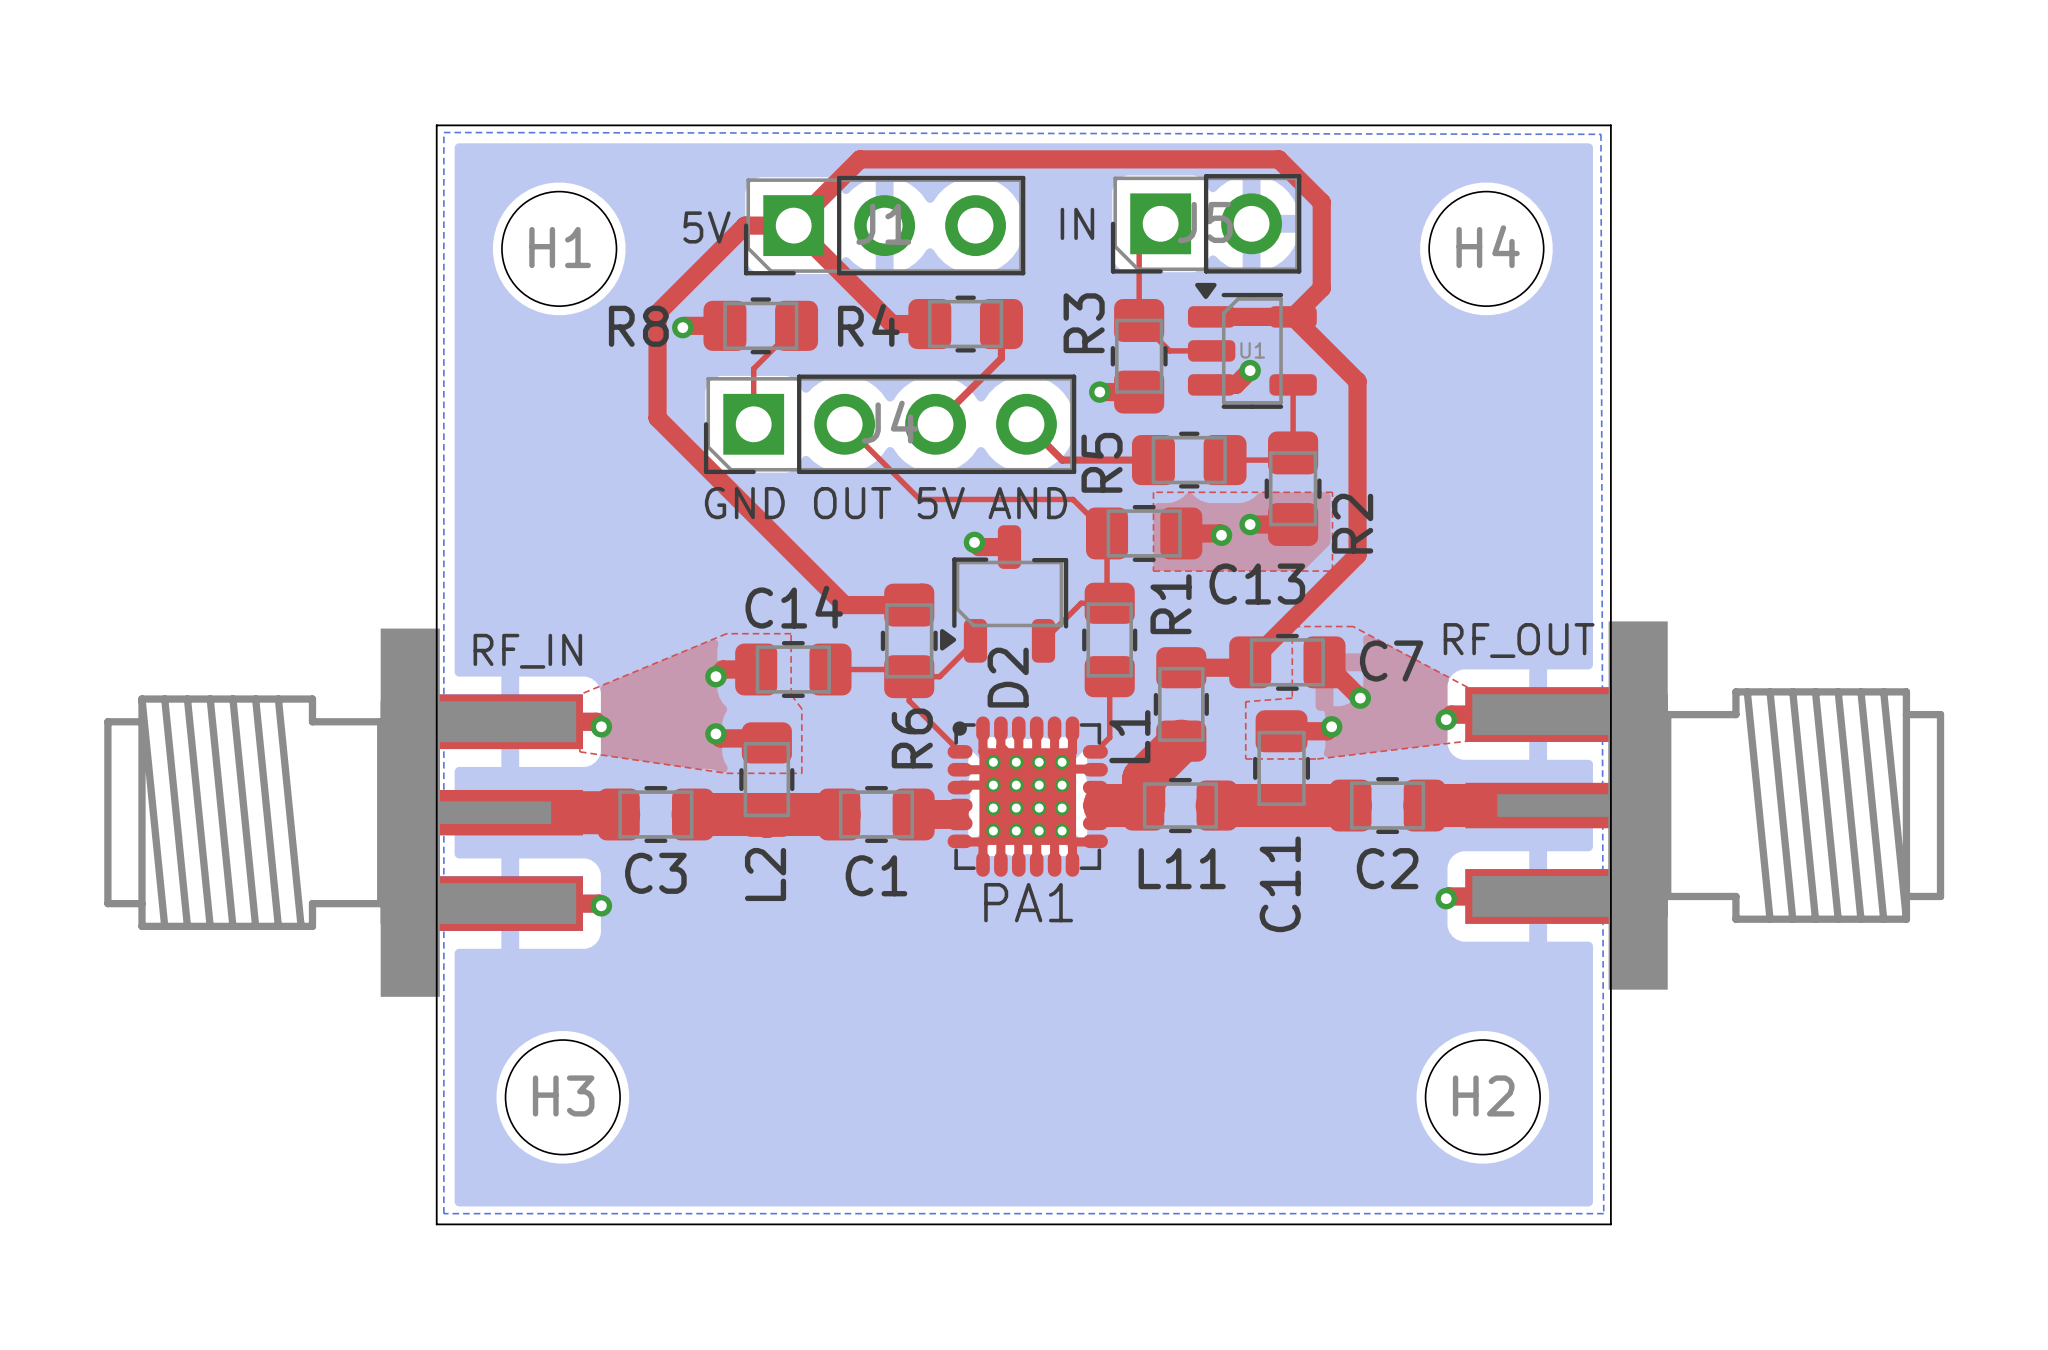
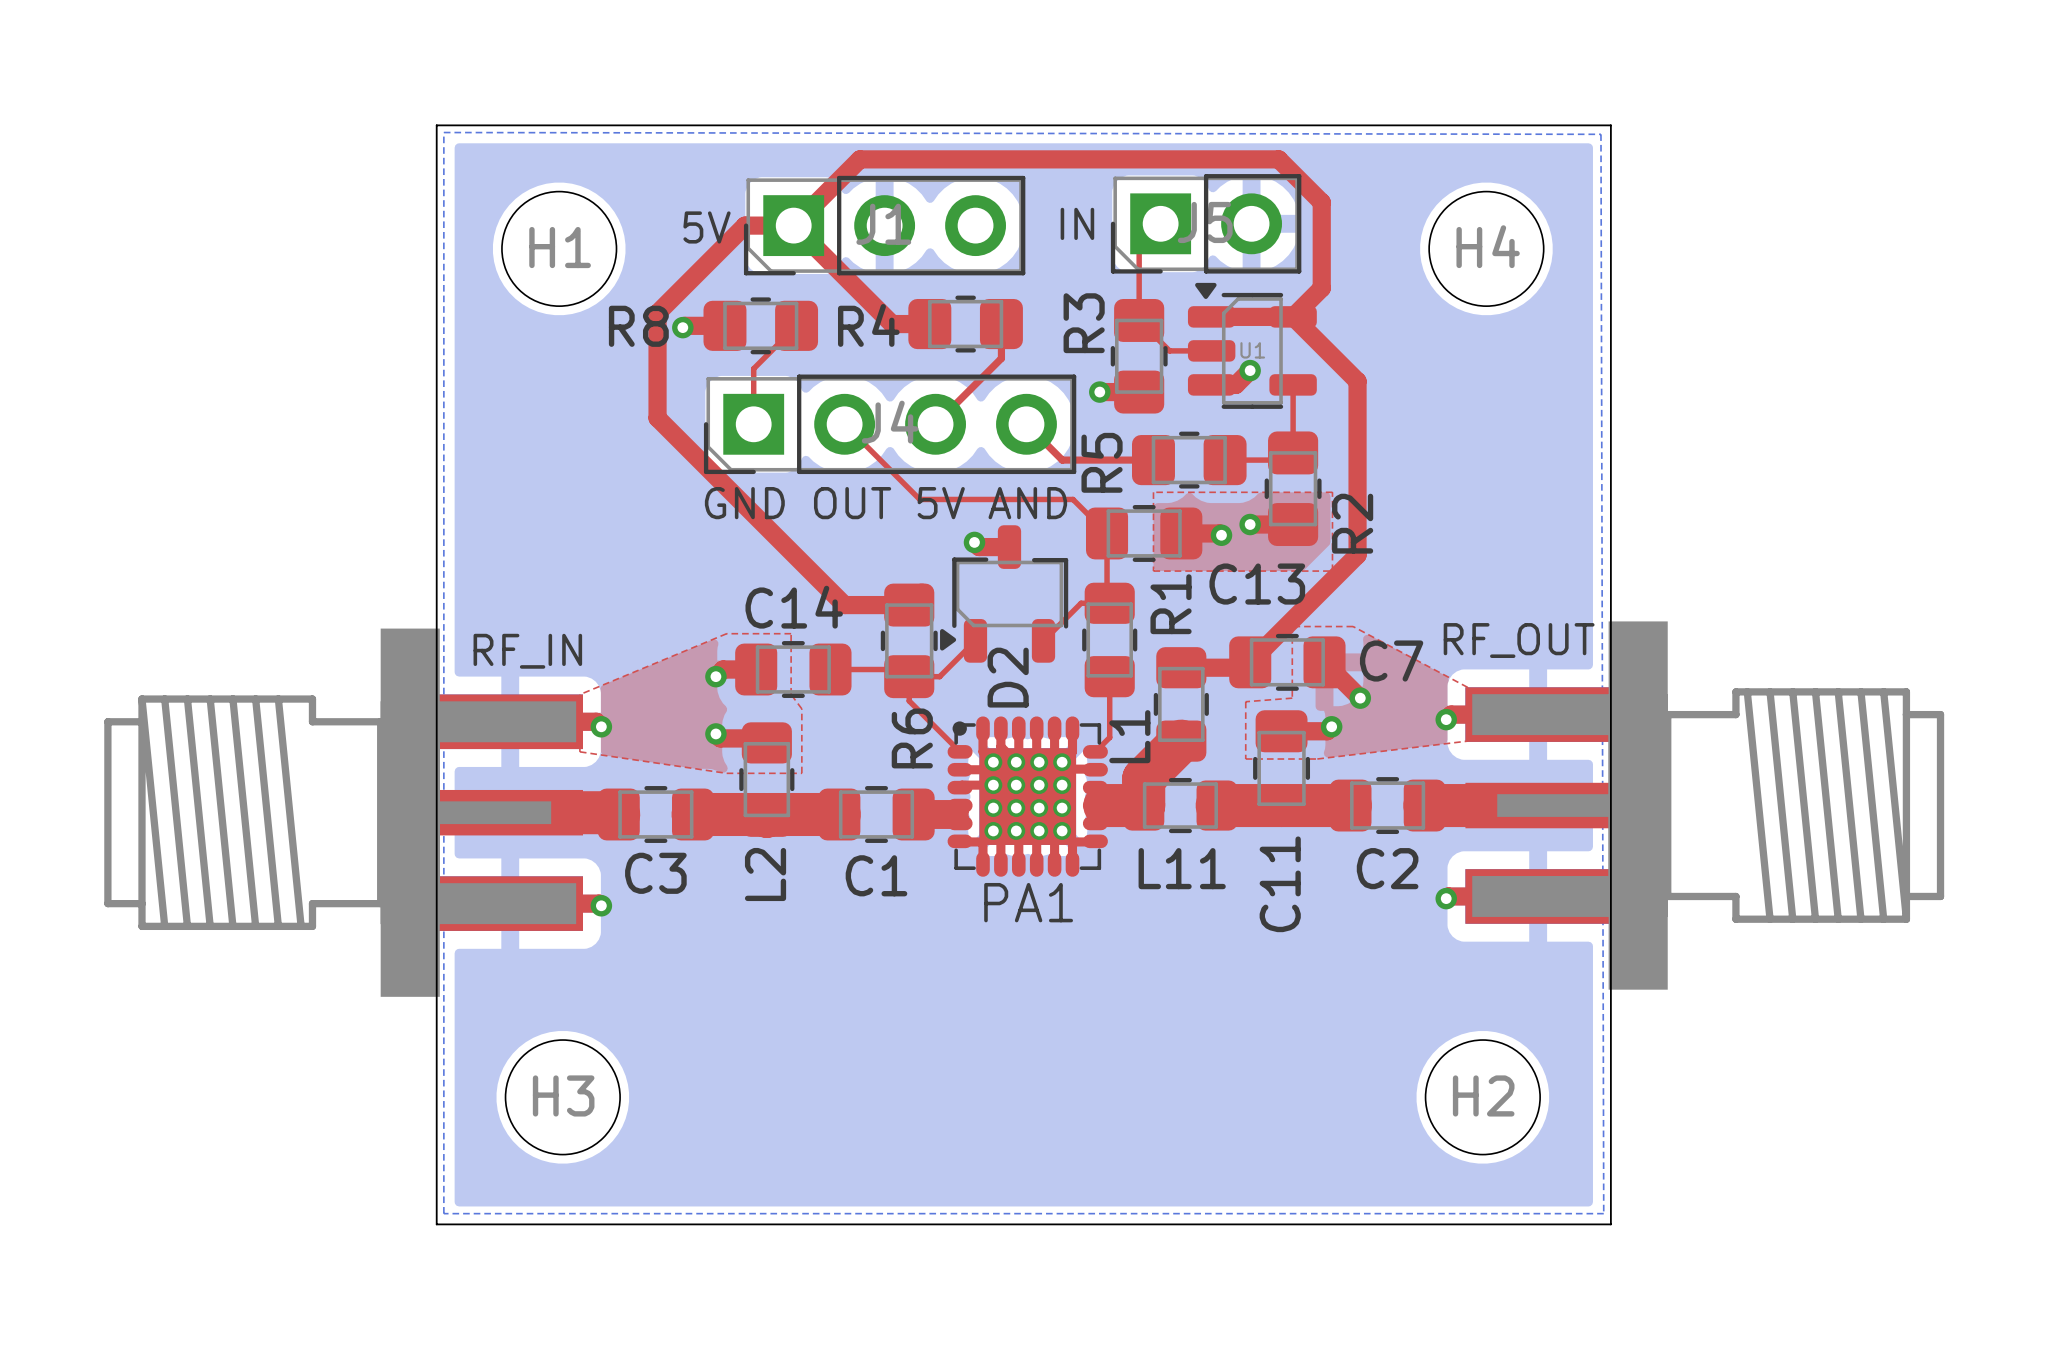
PA1 footprint: [947, 716, 1108, 877] -> [947, 716, 1108, 877]

